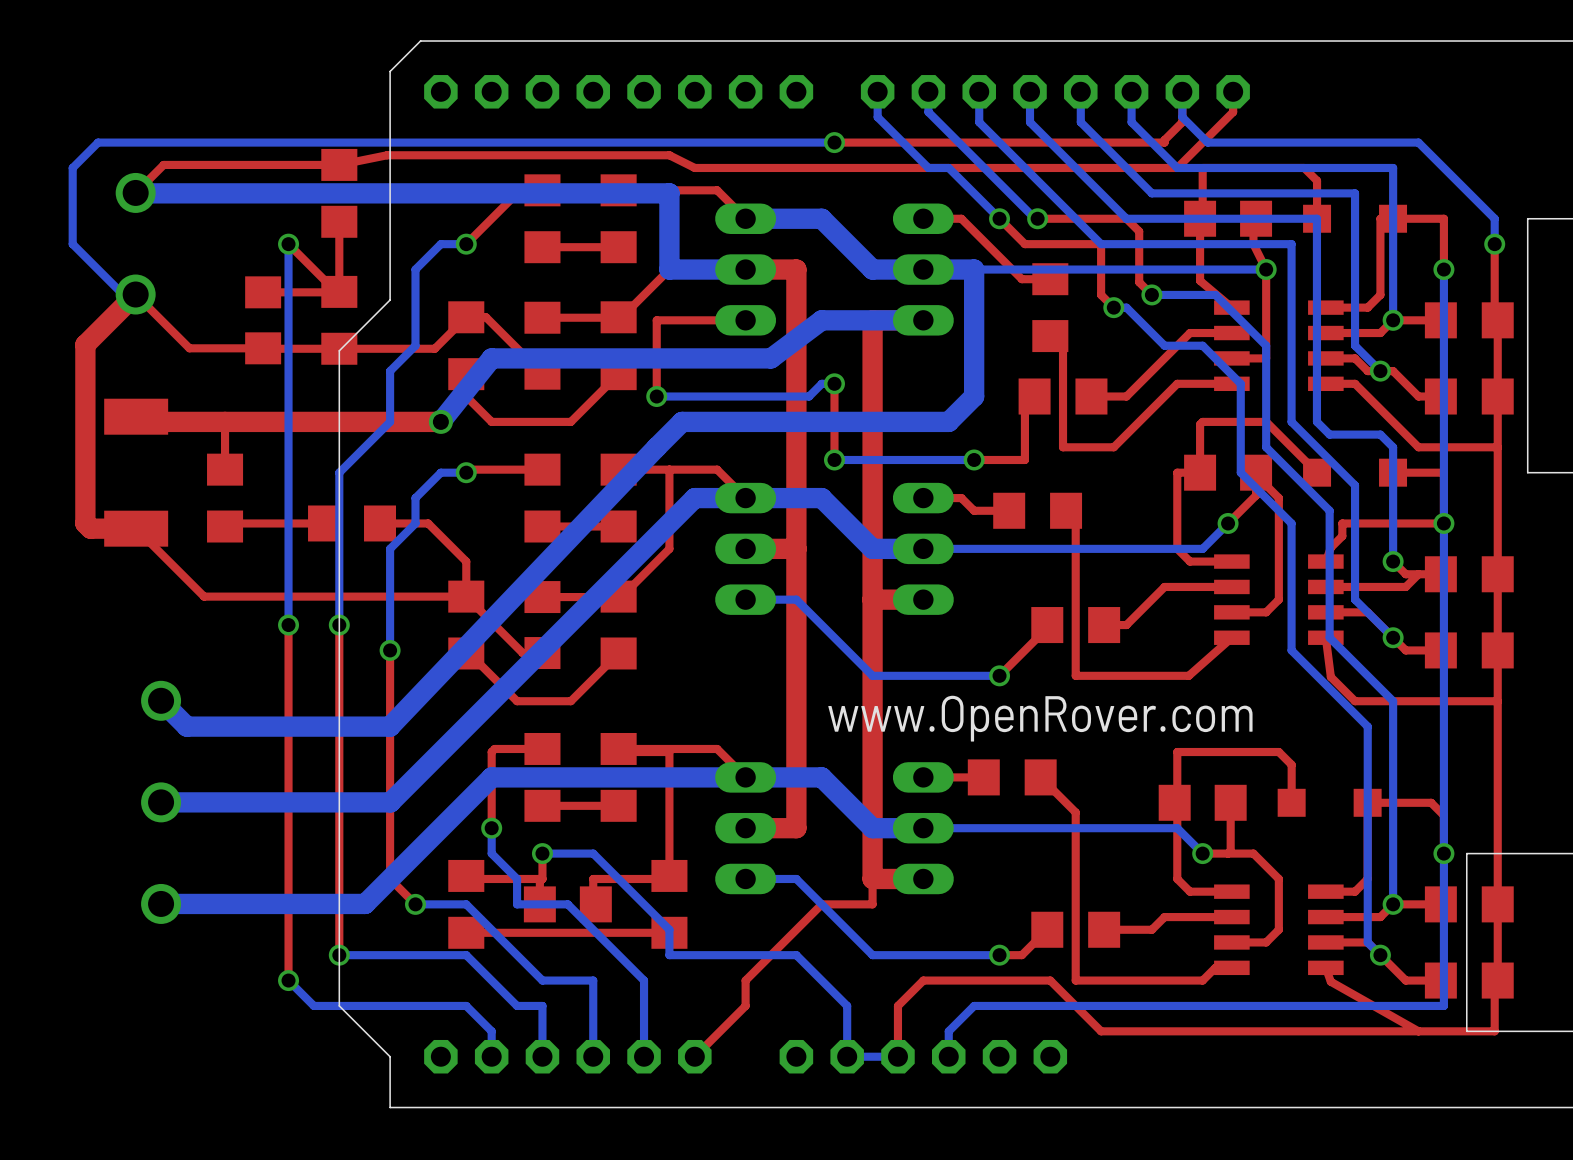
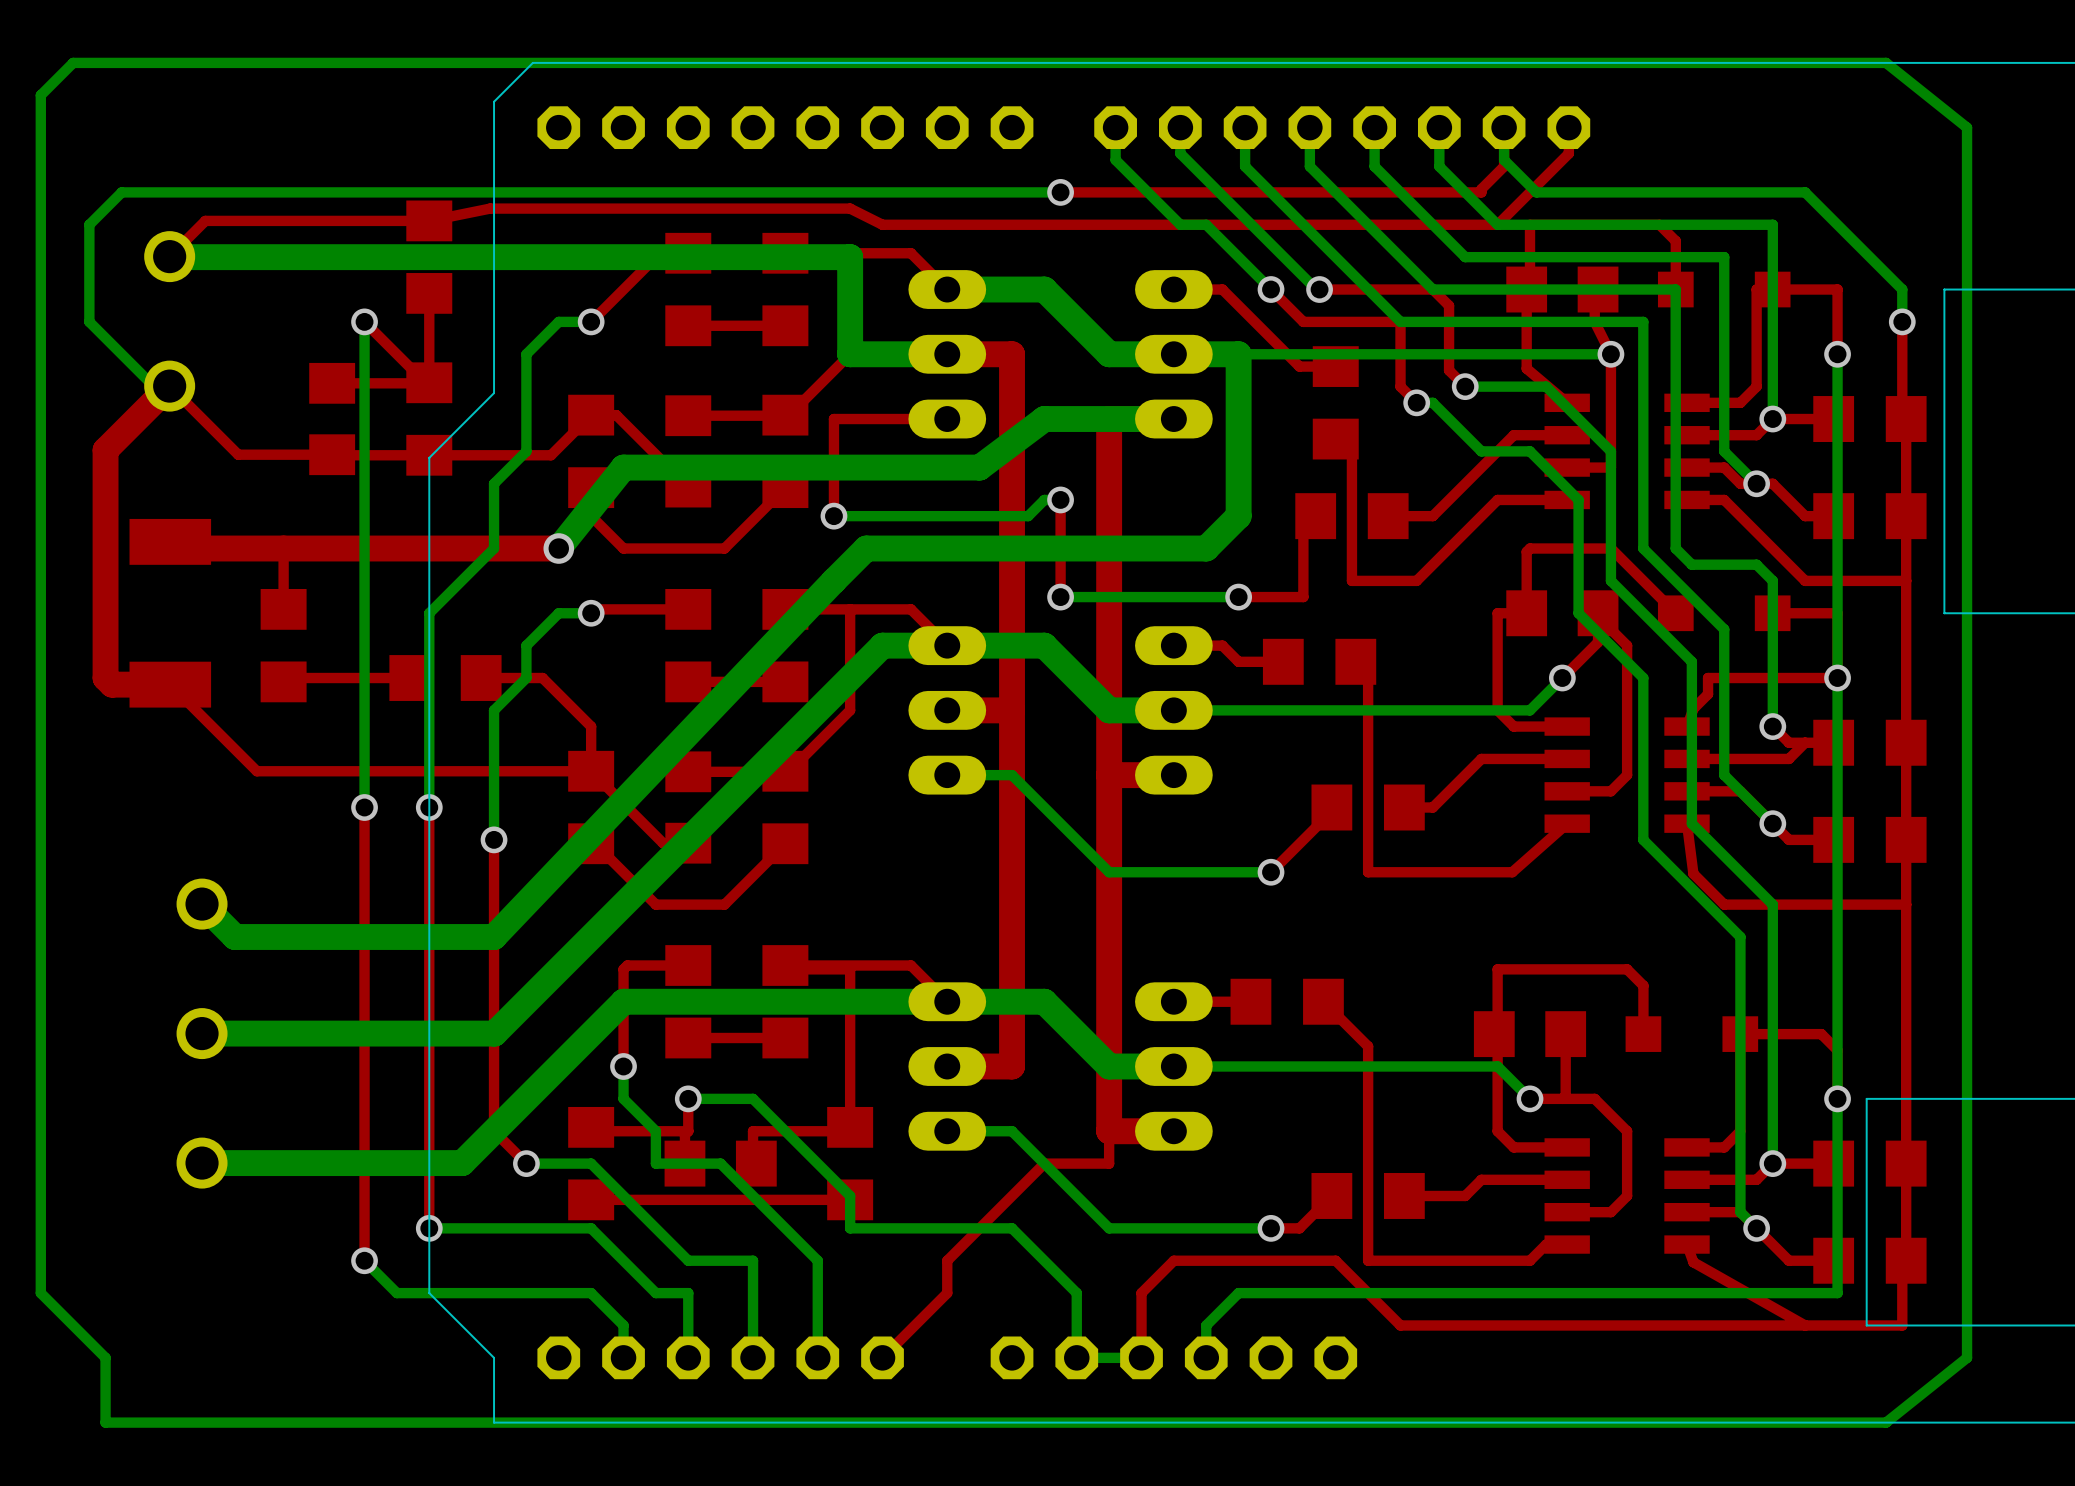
bottom track: none -> (1886, 62) (1967, 127) (1967, 1357) (1886, 1422) (105, 1422) (105, 1357) (40, 1293) (40, 95) (73, 62) (1886, 62)
text: www.OpenRover.com (1040, 718) -> none

